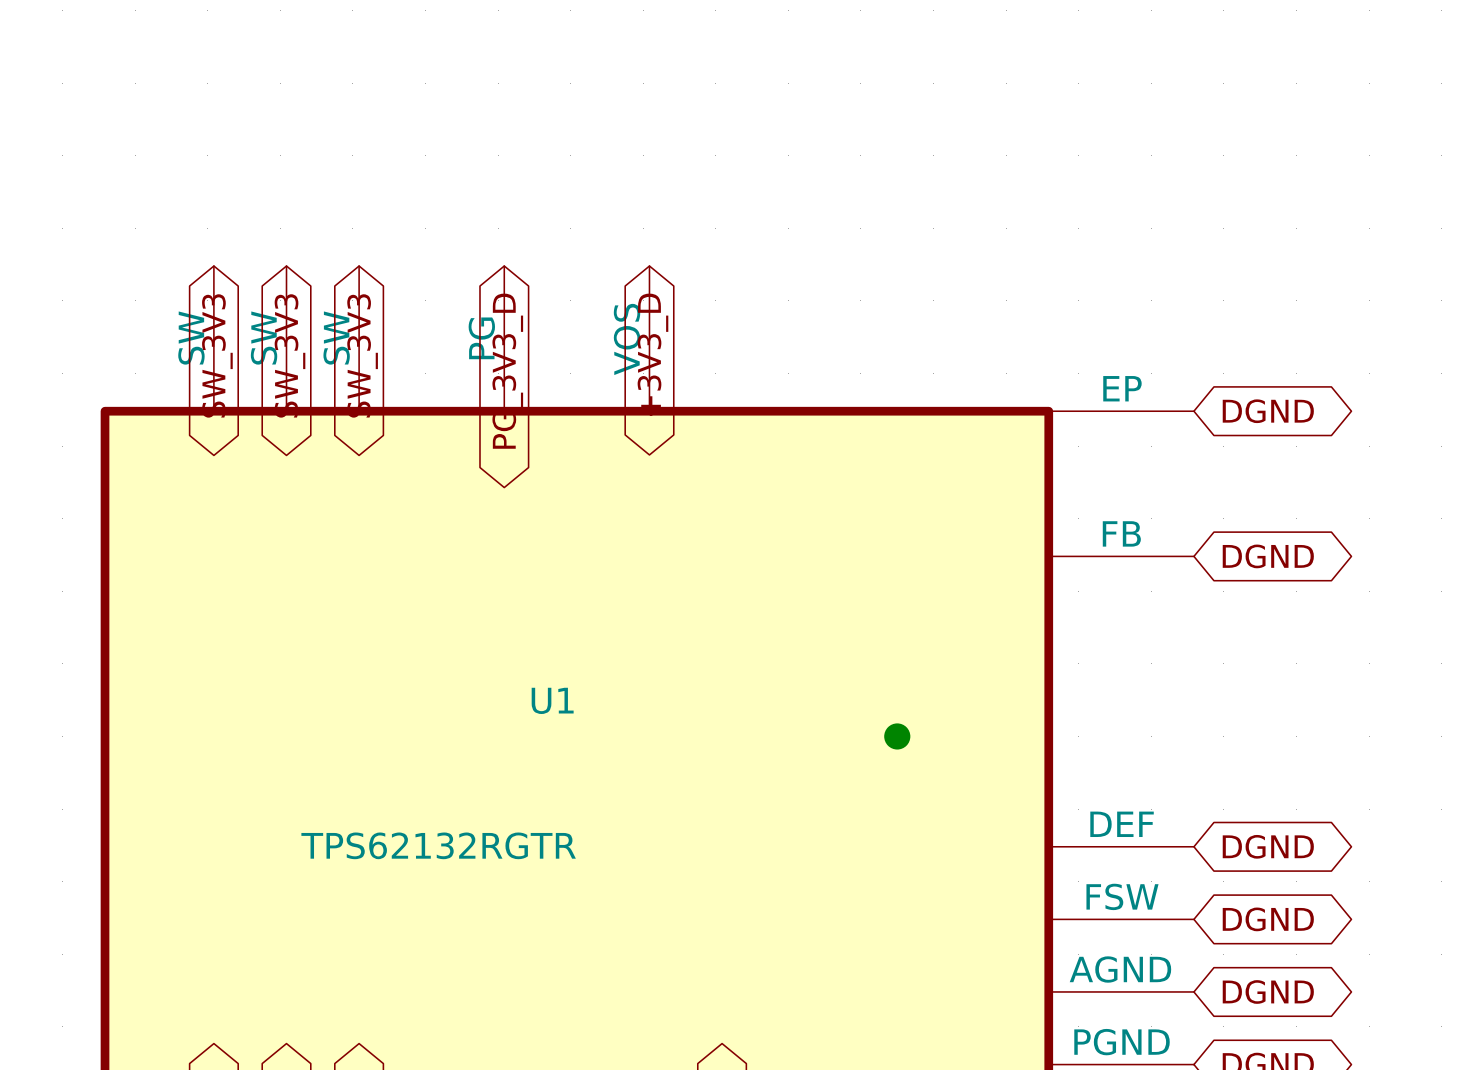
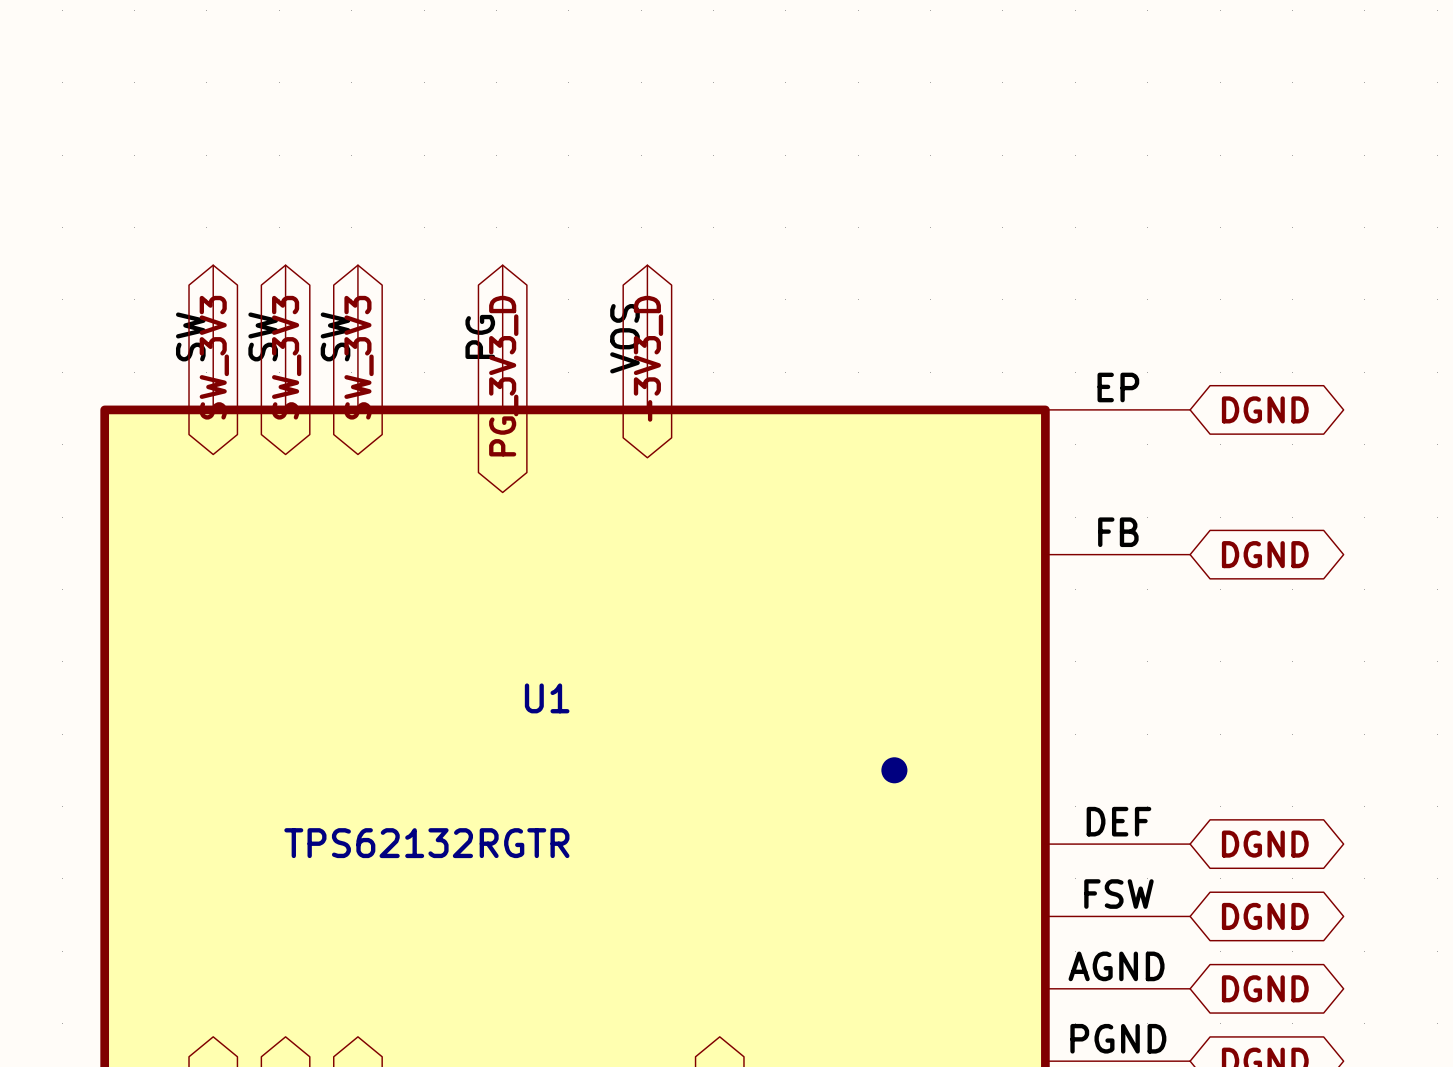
junction position: (897, 736) -> (894, 770)

